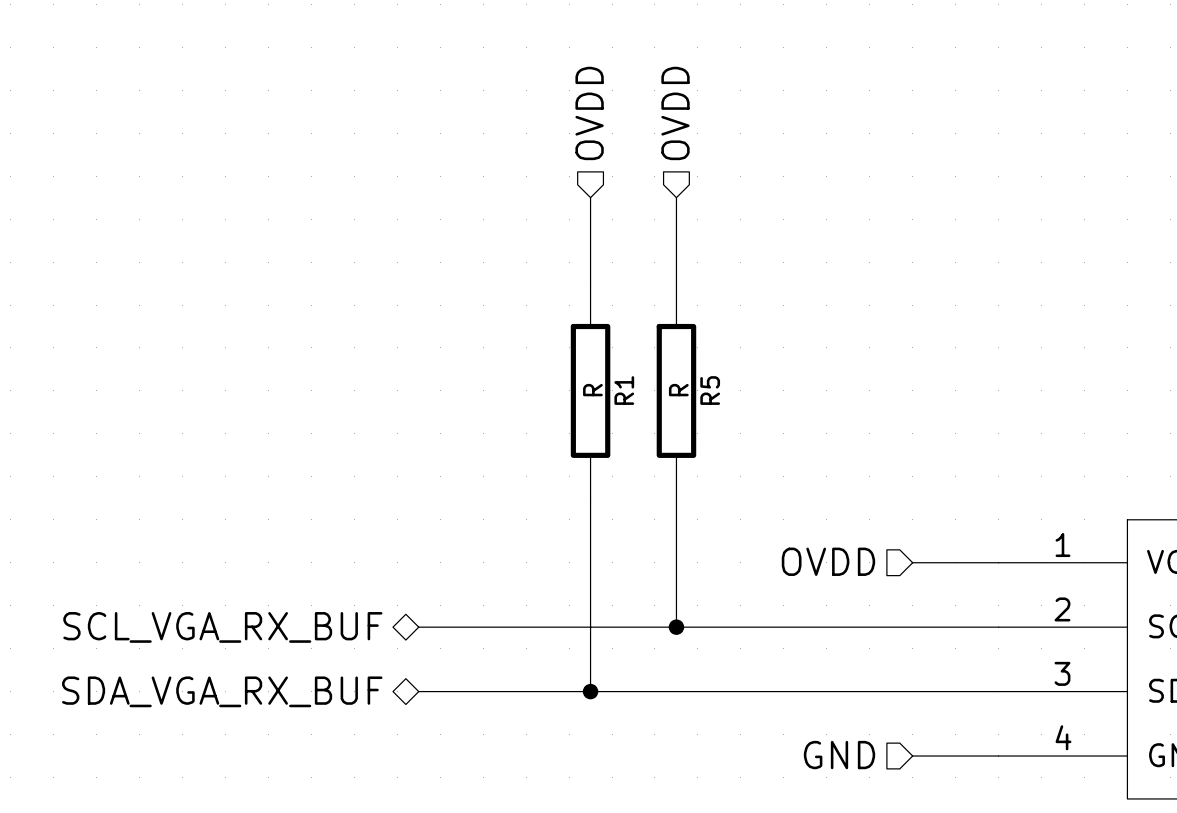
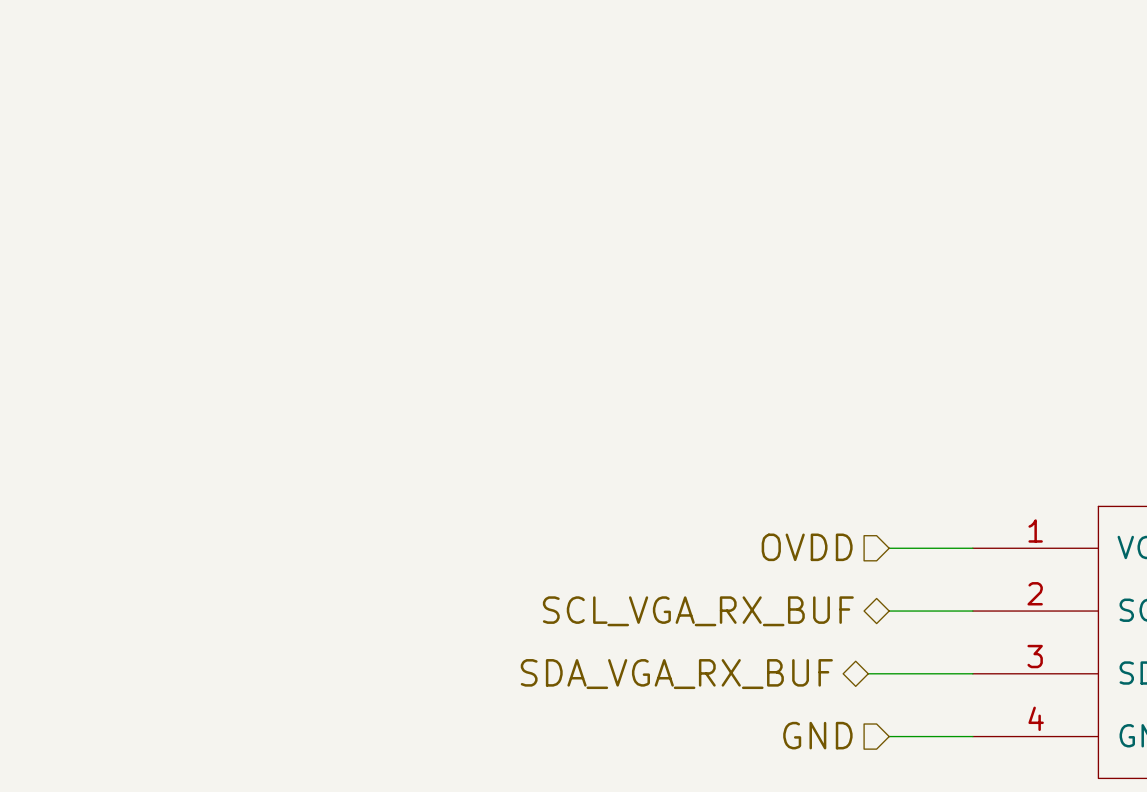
hierarchical label: OVDD (589, 113) -> none
hierarchical label: OVDD (675, 113) -> none
wire: (590, 197) (590, 283) -> none
wire: (676, 197) (676, 283) -> none
R1: R (590, 390) -> none
R5: R (676, 390) -> none
wire: (590, 498) (590, 691) -> none
wire: (676, 498) (676, 627) -> none
hierarchical label: SCL_VGA_RX_BUF (222, 627) -> none
wire: (418, 627) (912, 627) -> none
junction: (676, 627) -> none
hierarchical label: none -> SCL_VGA_RX_BUF (698, 611)
hierarchical label: SDA_VGA_RX_BUF (222, 691) -> none
wire: (418, 691) (891, 691) -> none
junction: (590, 691) -> none
hierarchical label: none -> SDA_VGA_RX_BUF (676, 674)

